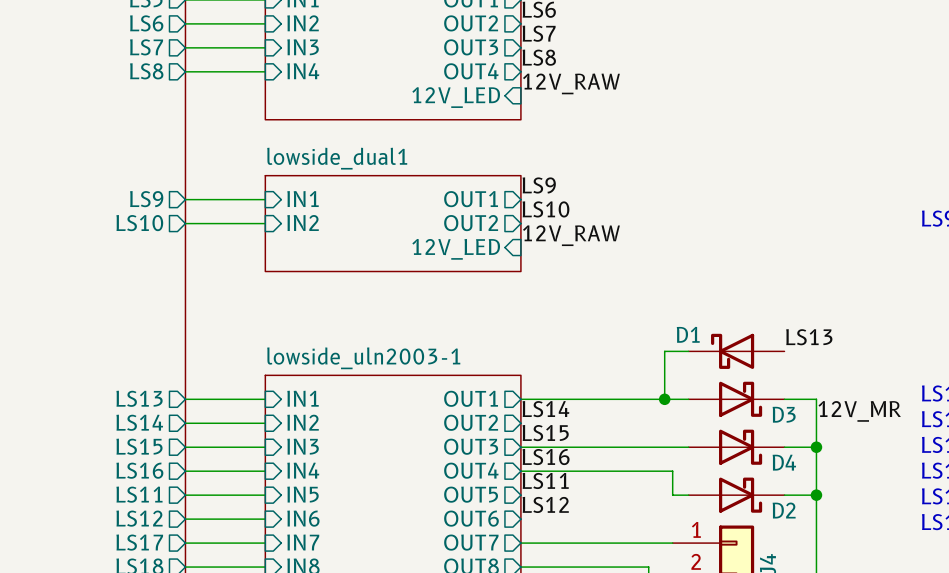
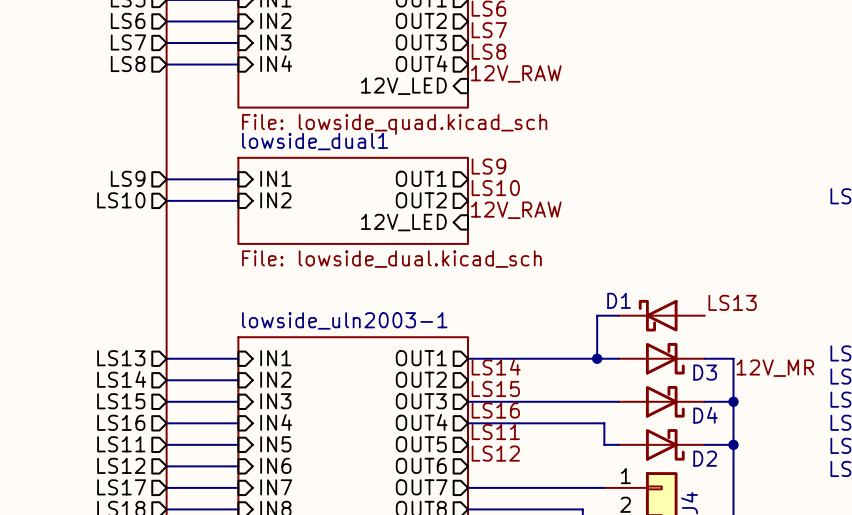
sheet value: none -> File: lowside_quad.kicad_sch (394, 124)
sheet lowside_dual1 value: none -> File: lowside_dual.kicad_sch (391, 259)

